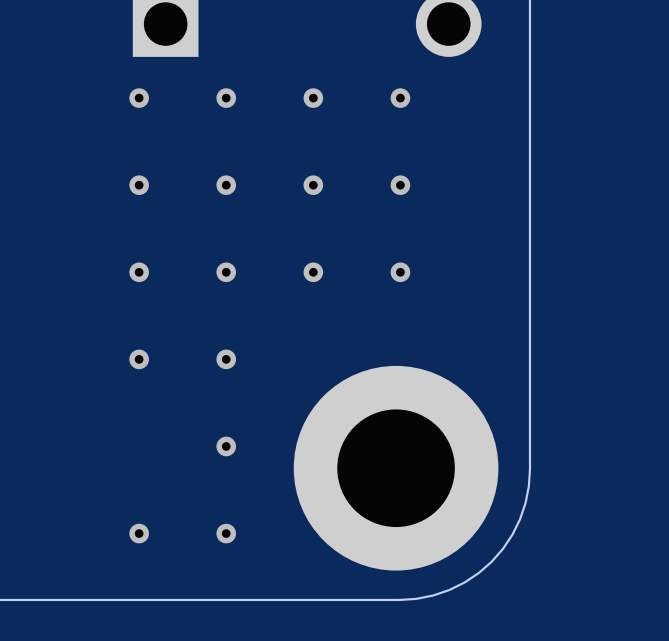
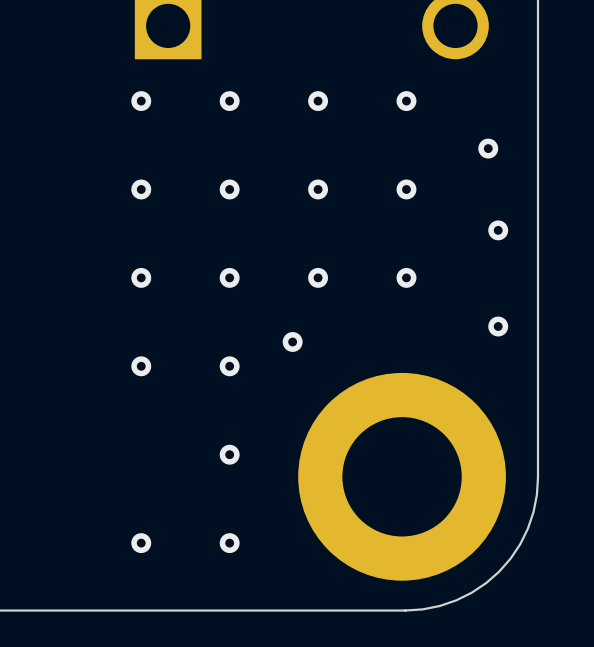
via: none -> (488, 148)
via: none -> (498, 230)
via: none -> (498, 326)
via: none -> (292, 341)

